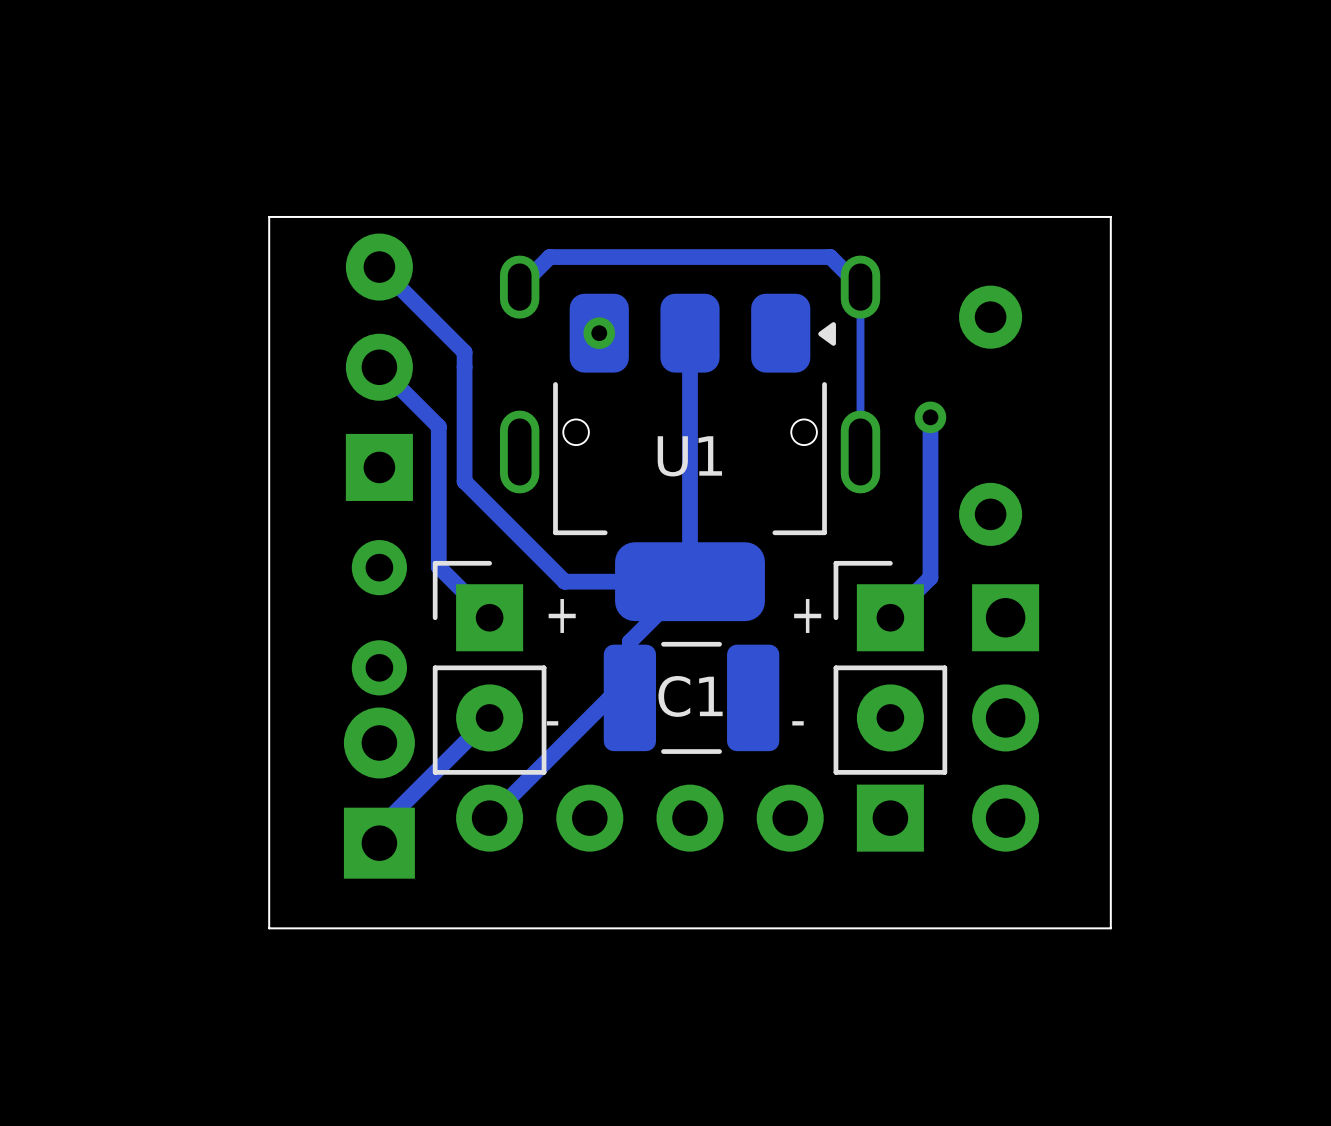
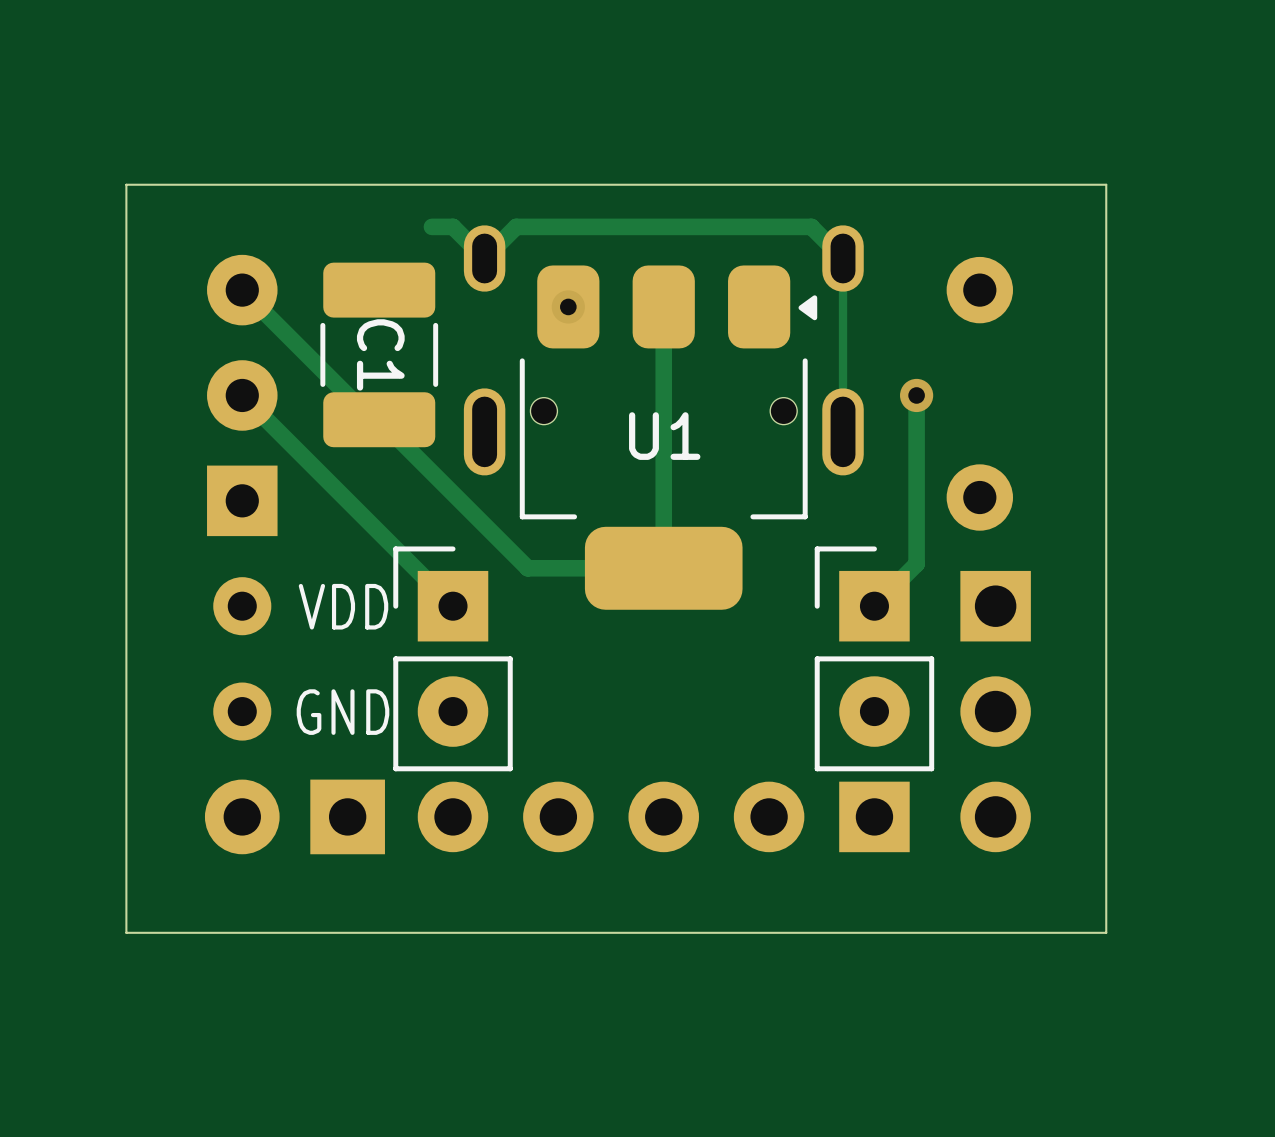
board edge: (269, 216) (269, 928) -> (221, 184) (126, 184) (126, 932) (221, 932)
track: none -> (431, 226) (453, 226) (484, 258)
track: (379, 267) (464, 352) (464, 481) (564, 581) -> (242, 290) (371, 419) (379, 419) (527, 568) (532, 568)
track: (379, 367) (438, 426) (438, 566) -> (242, 395) (399, 552)
part: (379, 367) -> none
part: none -> (242, 395)
track: (714, 581) (690, 581) (629, 641) (629, 697) (609, 697) (489, 818) -> none
text: + (562, 615) -> none
text: + (807, 615) -> none
part position: (379, 617) -> (242, 658)
text: none -> VDD (343, 606)
C1 rotation: 0° (691, 697) -> 90° clockwise (379, 354)
C1 position: (691, 697) -> (379, 354)
track: (489, 717) (389, 818) (389, 843) -> none
text: none -> GND (342, 712)
text: - (552, 723) -> none
text: - (798, 723) -> none
part rotation: 0° (379, 793) -> 90° counterclockwise (294, 816)

